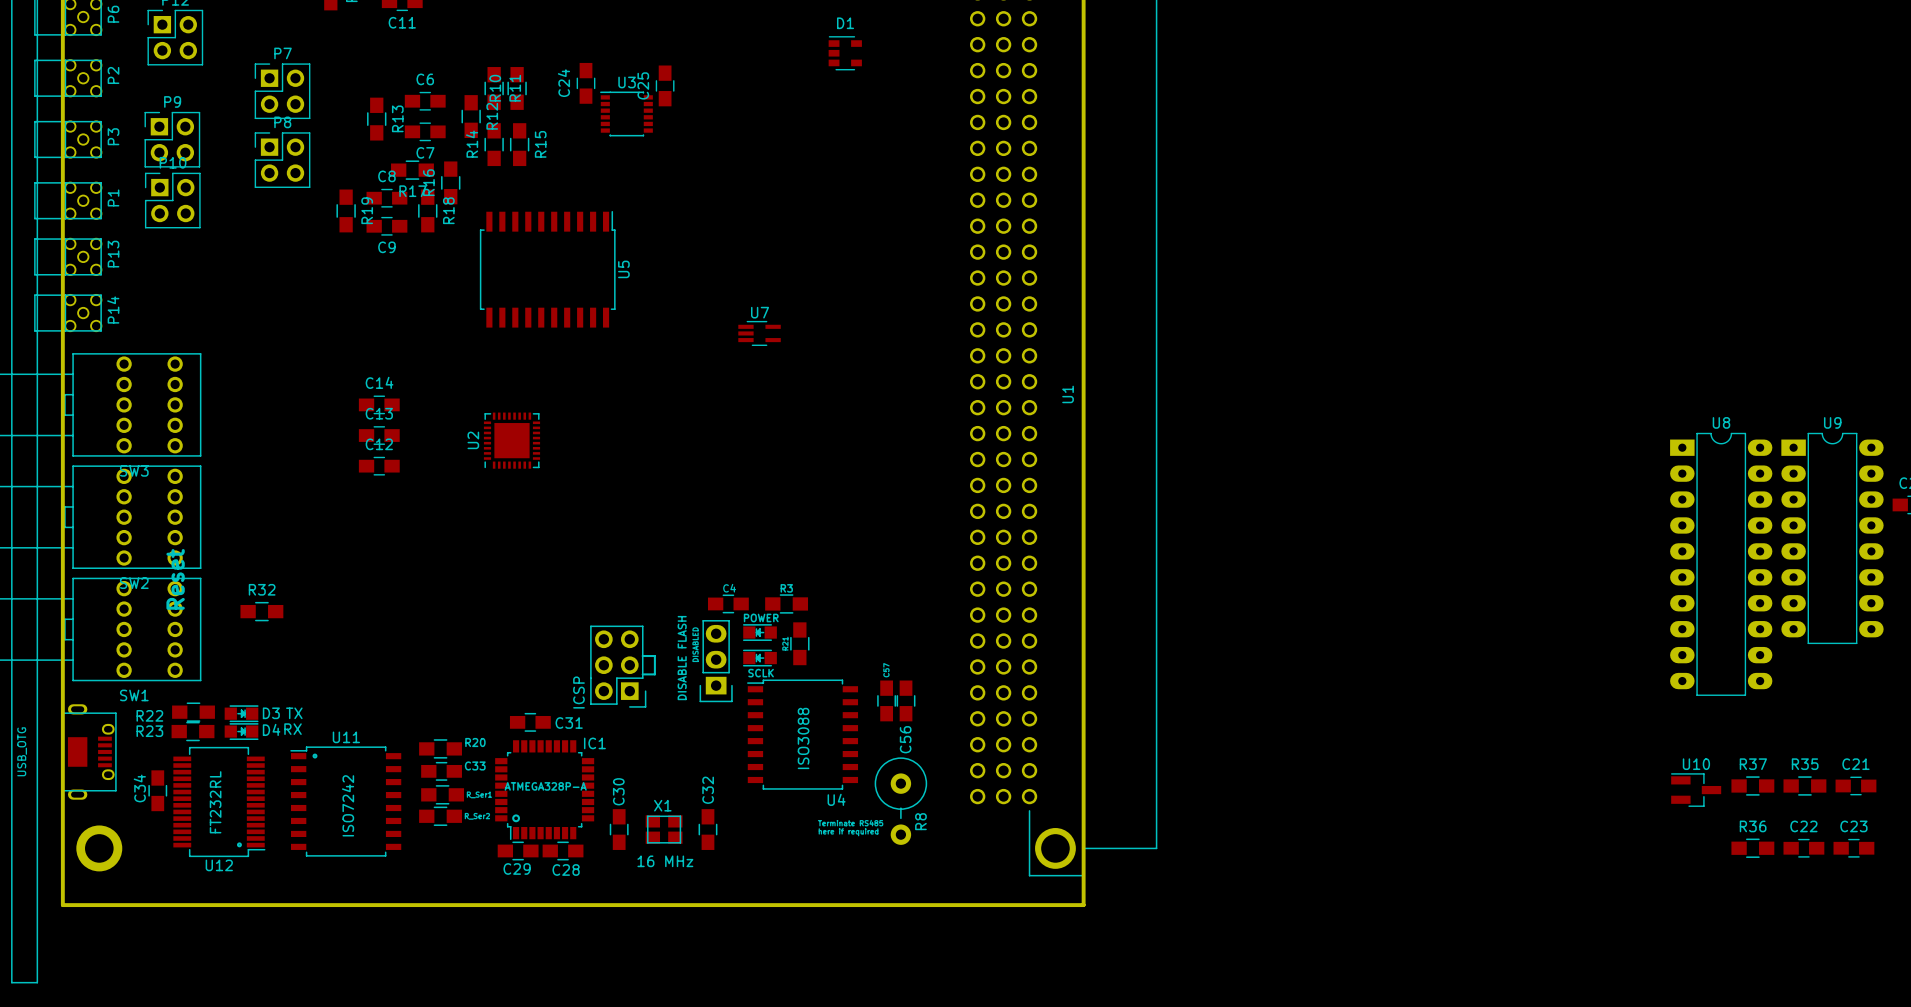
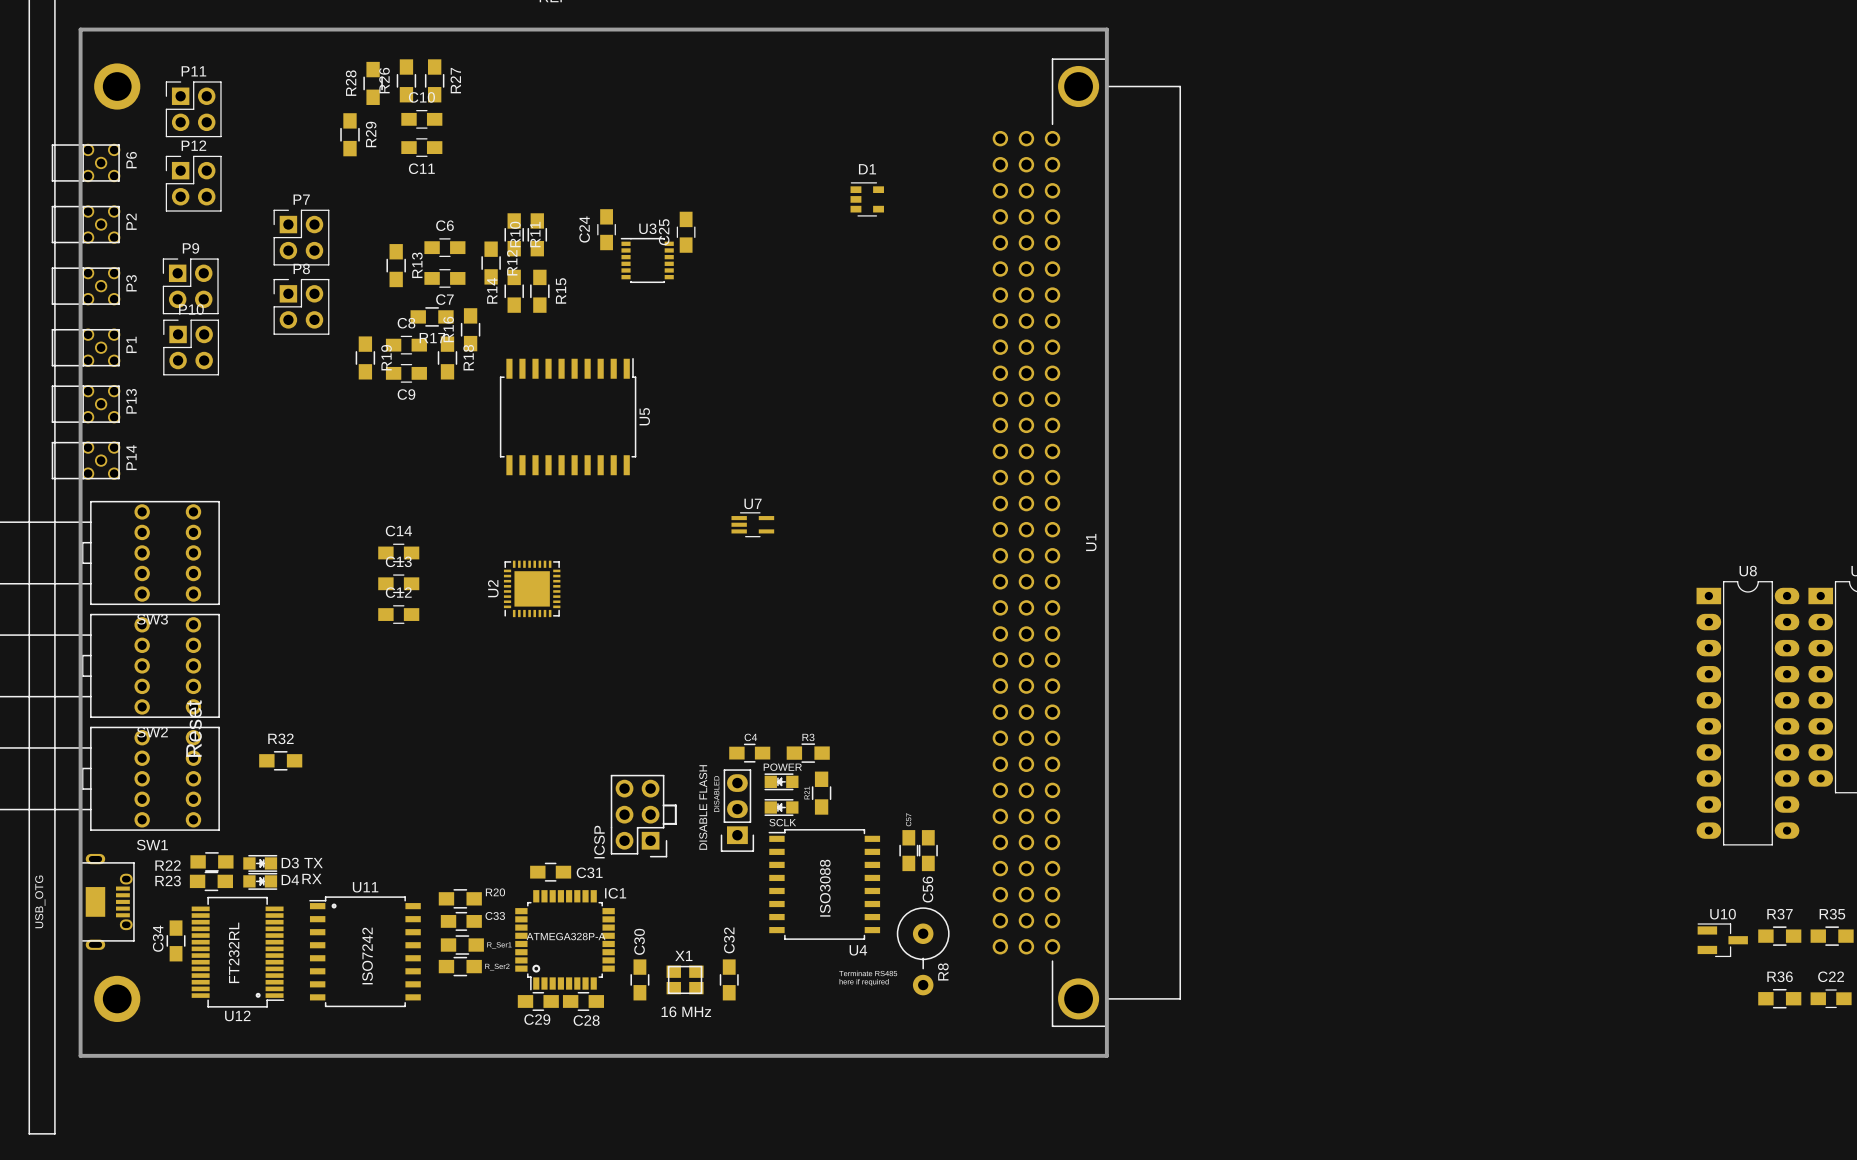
U7 position: (759, 333) -> (752, 524)

